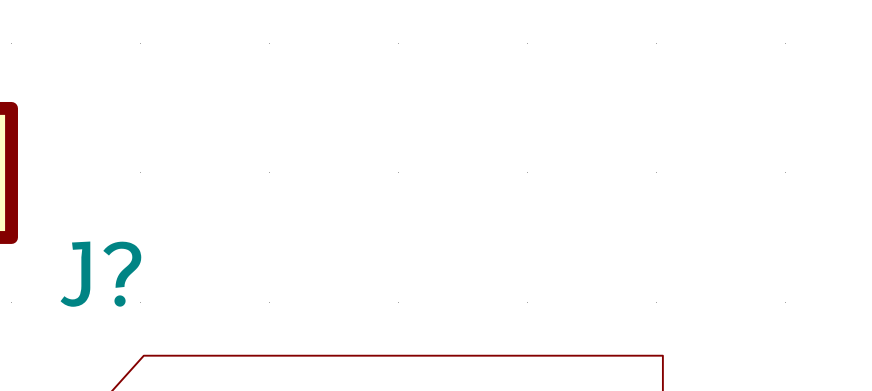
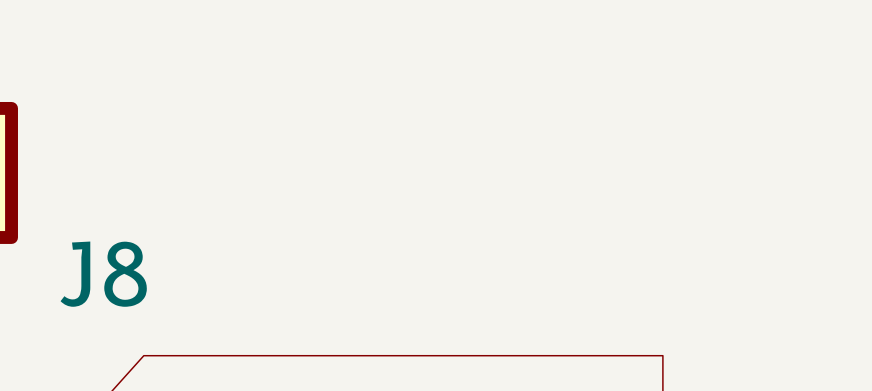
J? name: J? (100, 274) -> J8 (103, 274)

